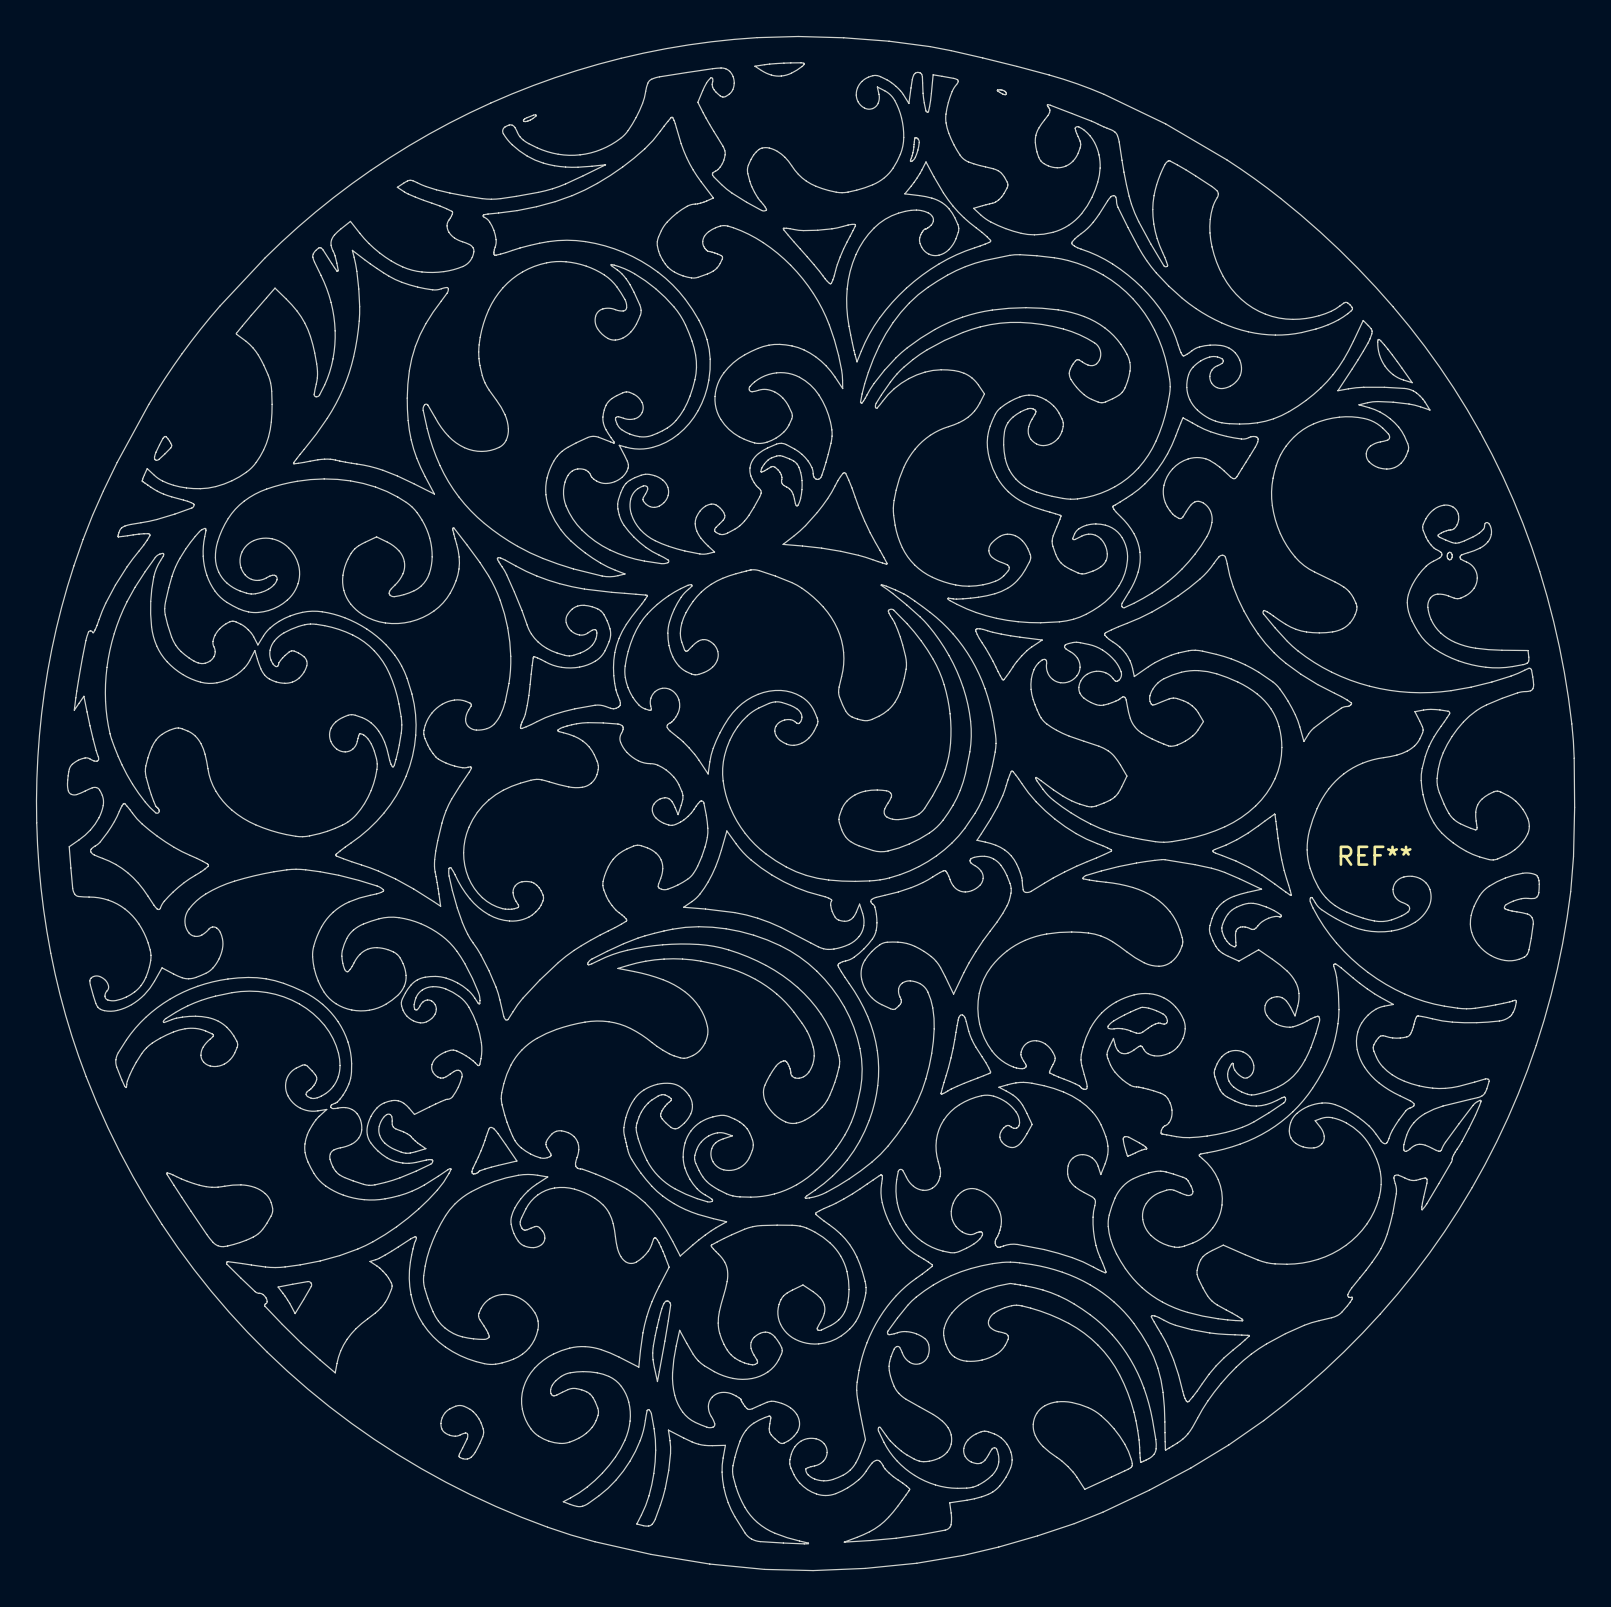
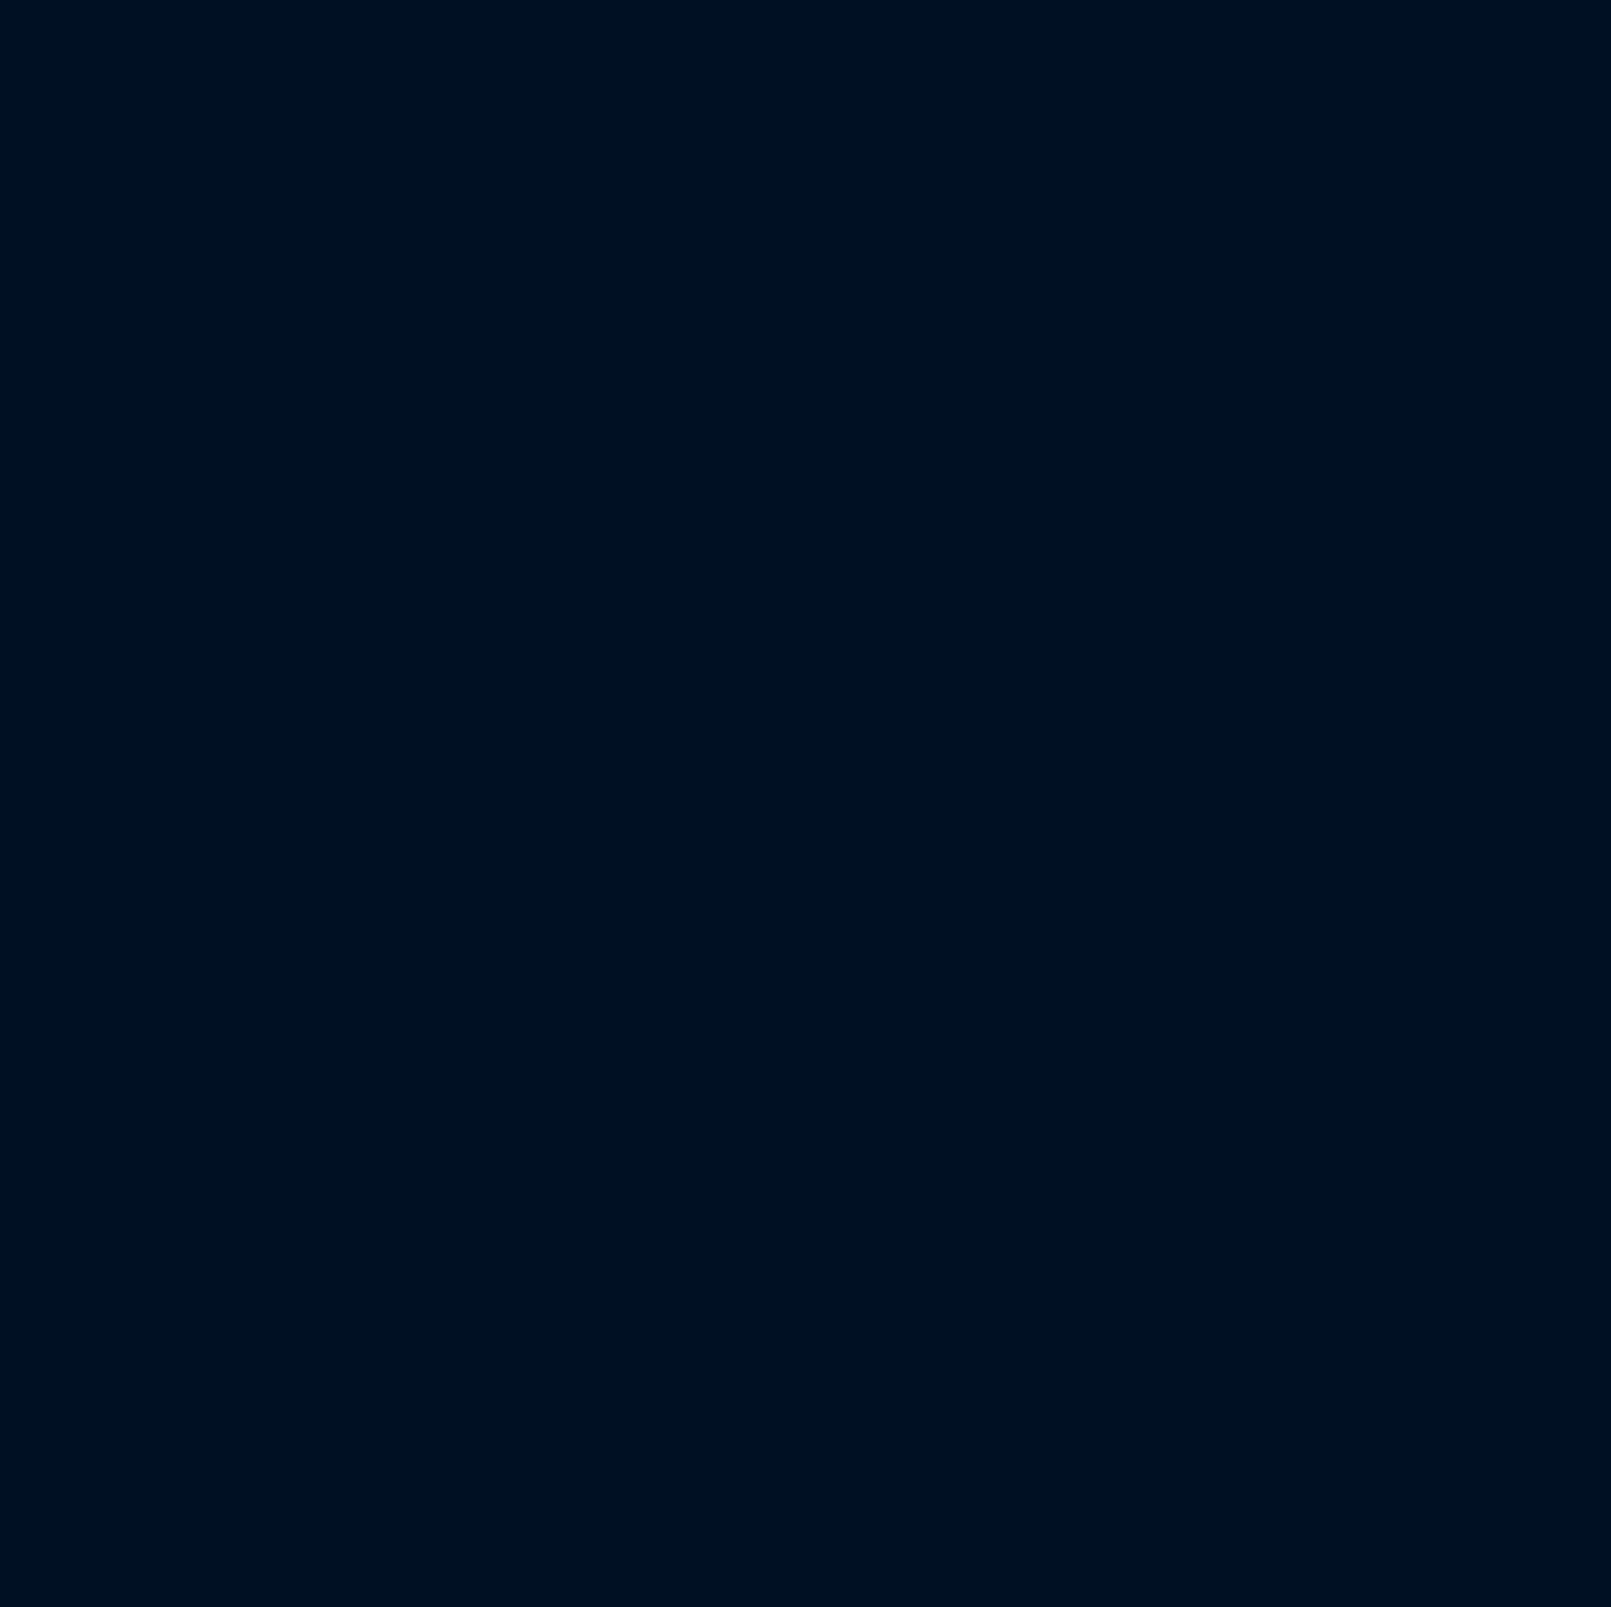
REF**: (805, 803) -> none

